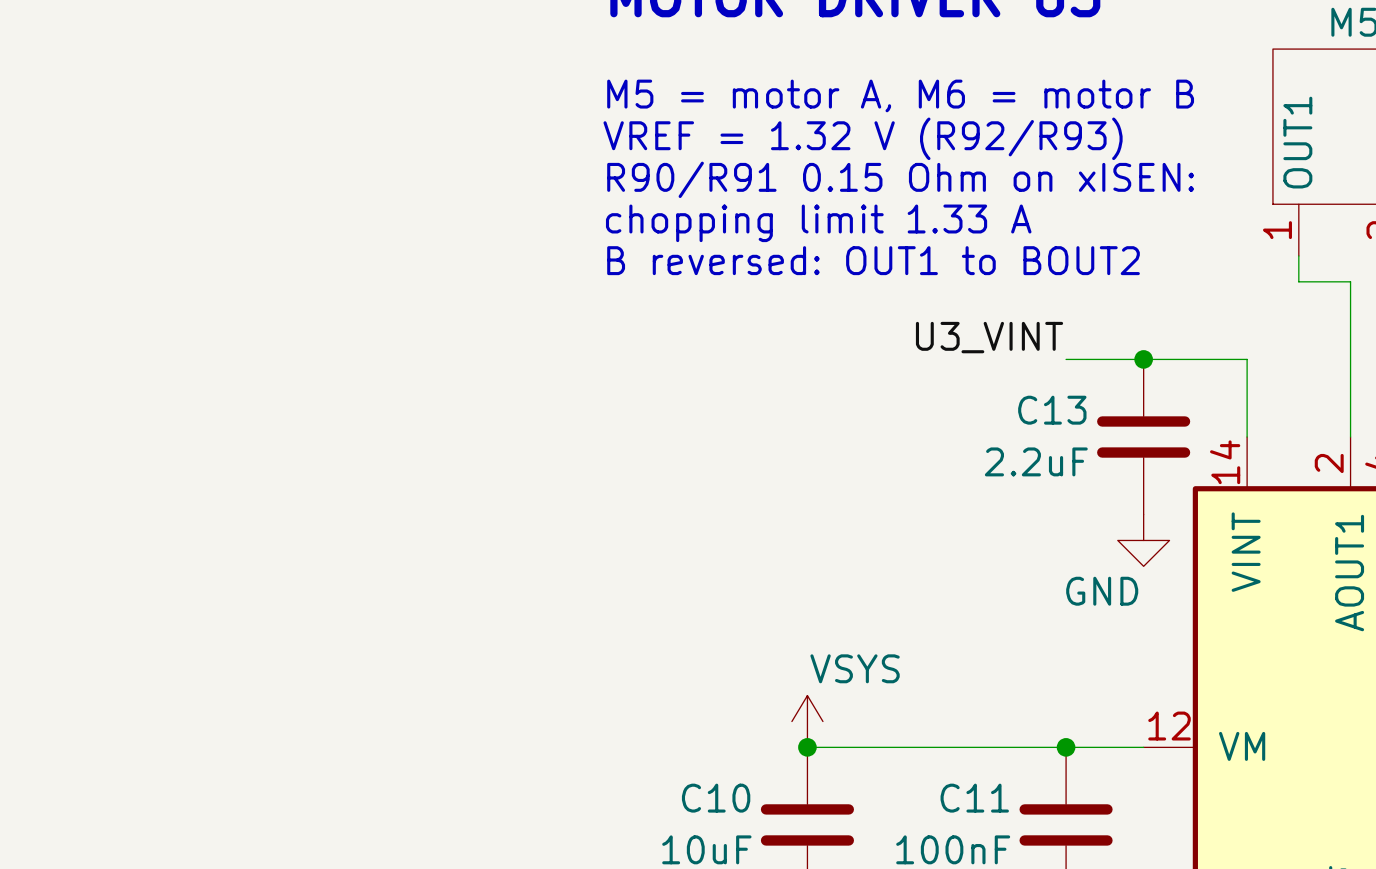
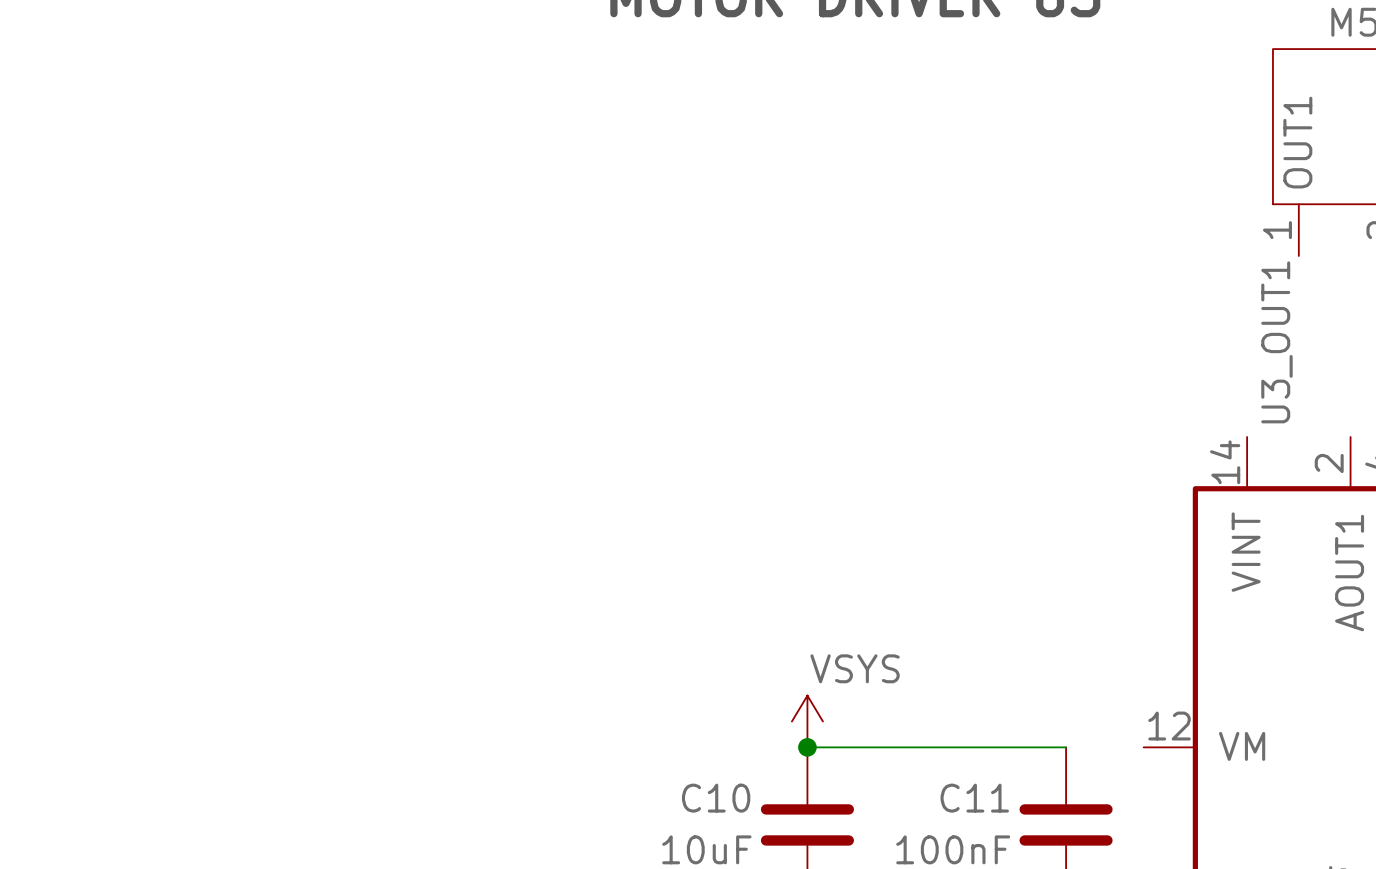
text: M5 = motor A, M6 = motor B (900, 95) -> none
text: VREF = 1.32 V (R92/R93) (863, 138) -> none
text: R90/R91 0.15 Ohm on xISEN: (900, 179) -> none
text: chopping limit 1.33 A (818, 223) -> none
wire: (1298, 255) (1298, 281) (1350, 281) (1350, 437) -> none
text: B reversed: OUT1 to BOUT2 (873, 260) -> none
label: U3_VINT (989, 337) -> none
label: none -> U3_OUT1 (1276, 342)
wire: (1066, 359) (1247, 359) (1247, 437) -> none
junction: (1143, 359) -> none
C13: 2.2uF (1143, 437) -> none
power symbol: GND (1143, 540) -> none
wire: (1066, 747) (1143, 747) -> none
junction: (1066, 747) -> none

